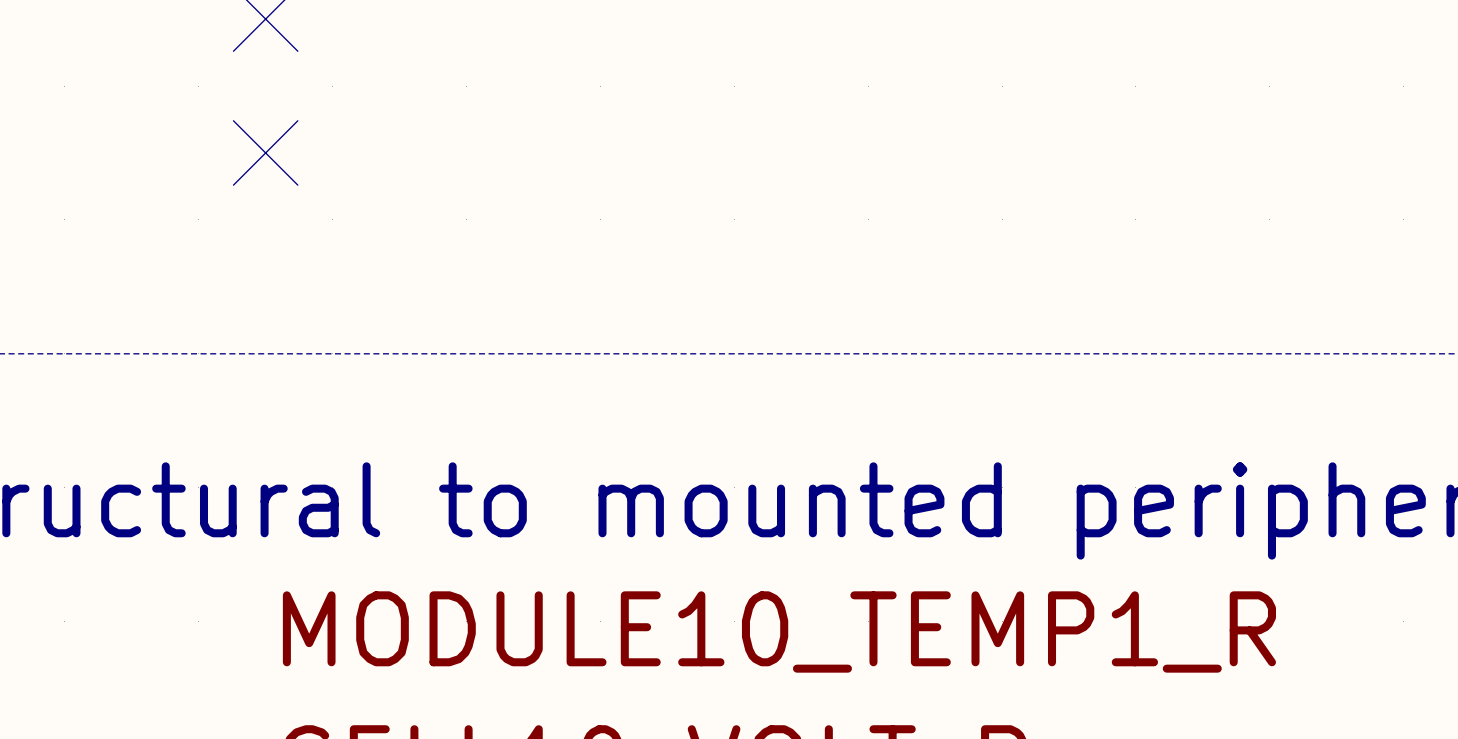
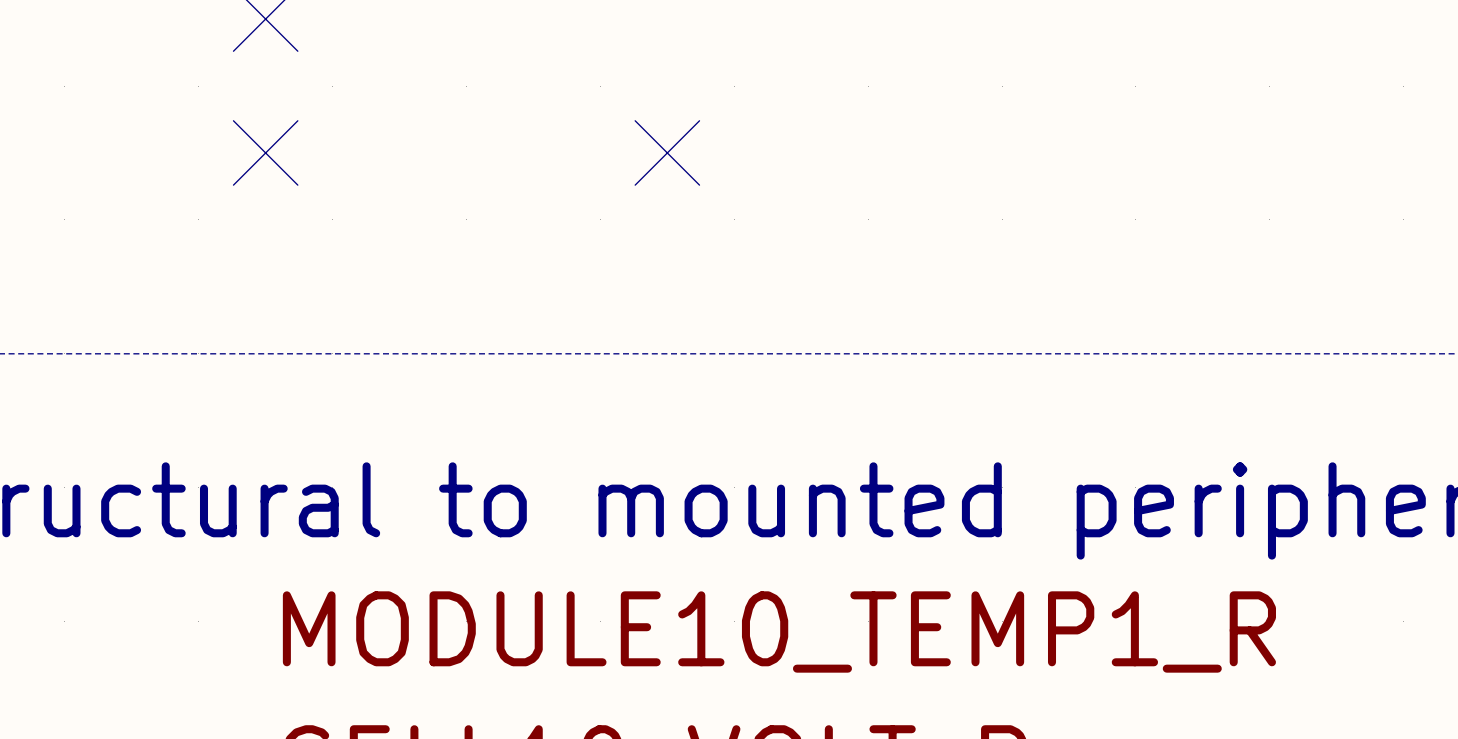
no-connect mark: none -> (667, 152)

